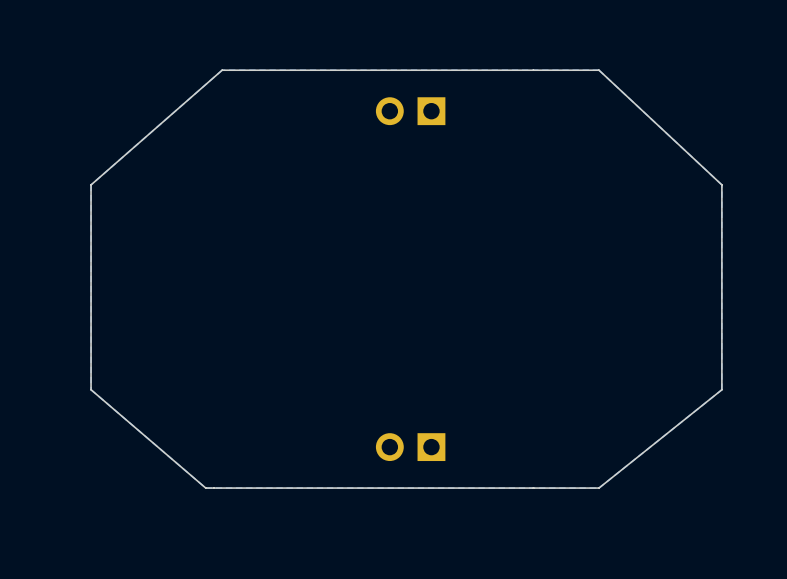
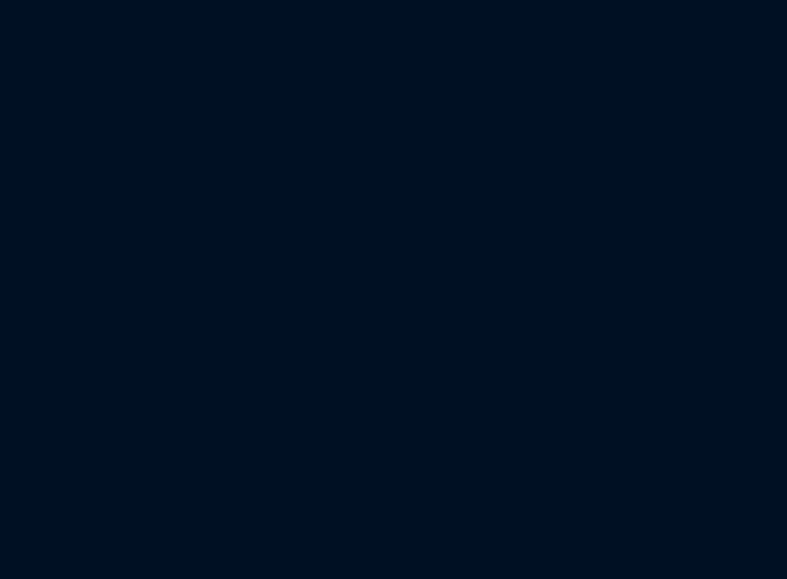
board edge: (599, 70) (222, 70) (91, 184) (91, 389) (205, 488) (599, 488) (721, 389) (721, 184) (599, 70) -> none
part: (410, 111) -> none
part: (410, 447) -> none

